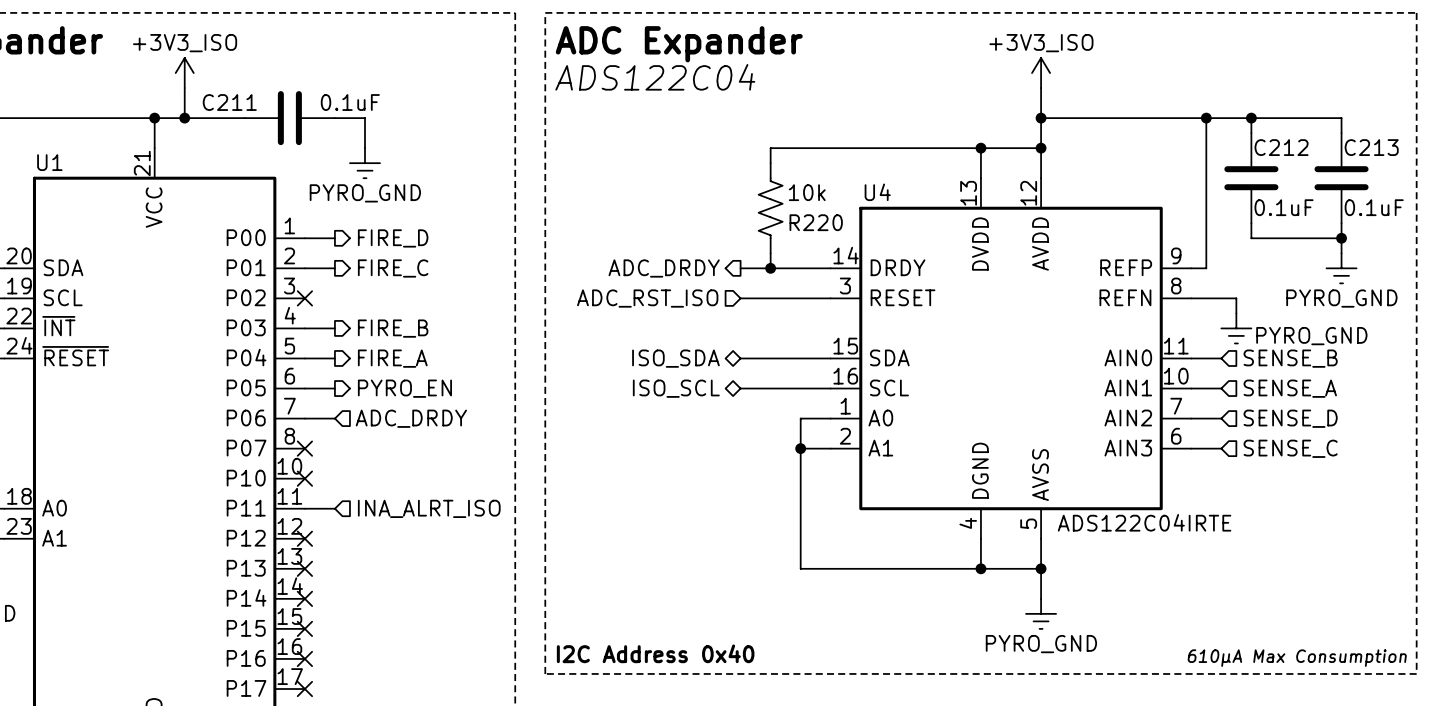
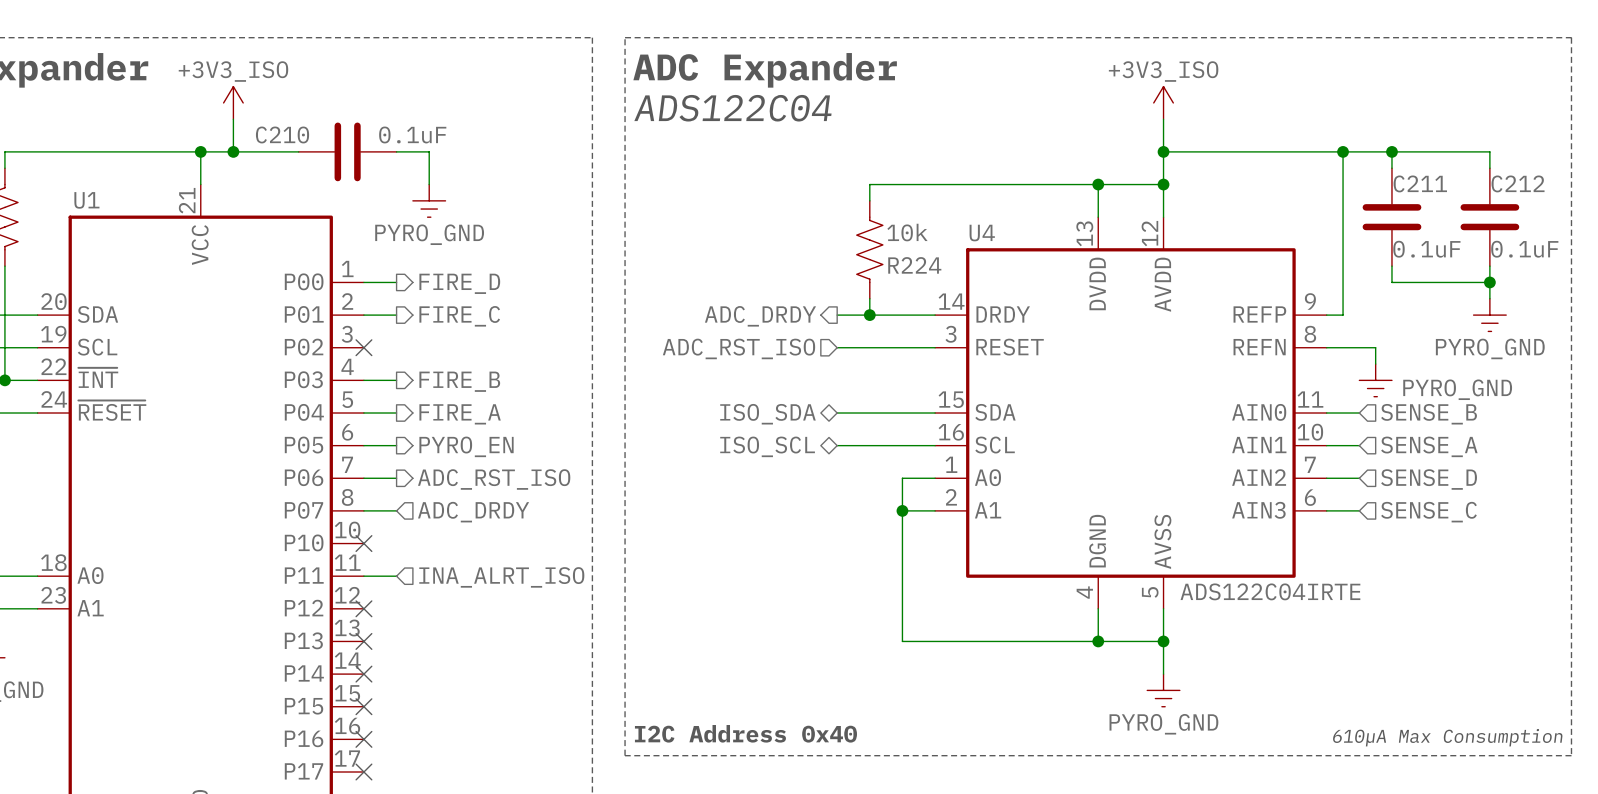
C211 name: C211 (229, 102) -> C210 (282, 134)
C212 name: C212 (1281, 147) -> C211 (1420, 183)
C213 name: C213 (1371, 147) -> C212 (1518, 183)
R220 name: R220 (816, 222) -> R224 (914, 265)
hierarchical label shape: input (411, 418) -> output (494, 479)
hierarchical label: ADC_DRDY (411, 418) -> ADC_RST_ISO (494, 479)
wire: none -> (363, 510) (396, 510)
no-connect mark: (304, 448) -> none
hierarchical label: none -> ADC_DRDY (473, 512)

